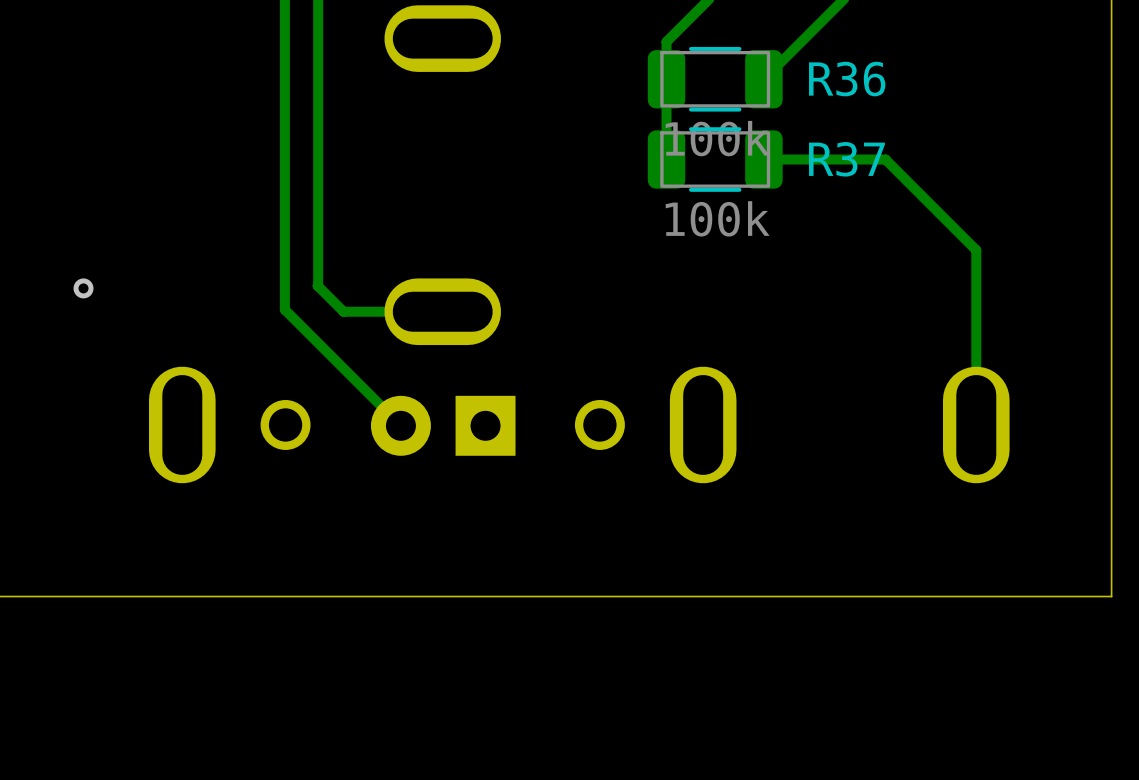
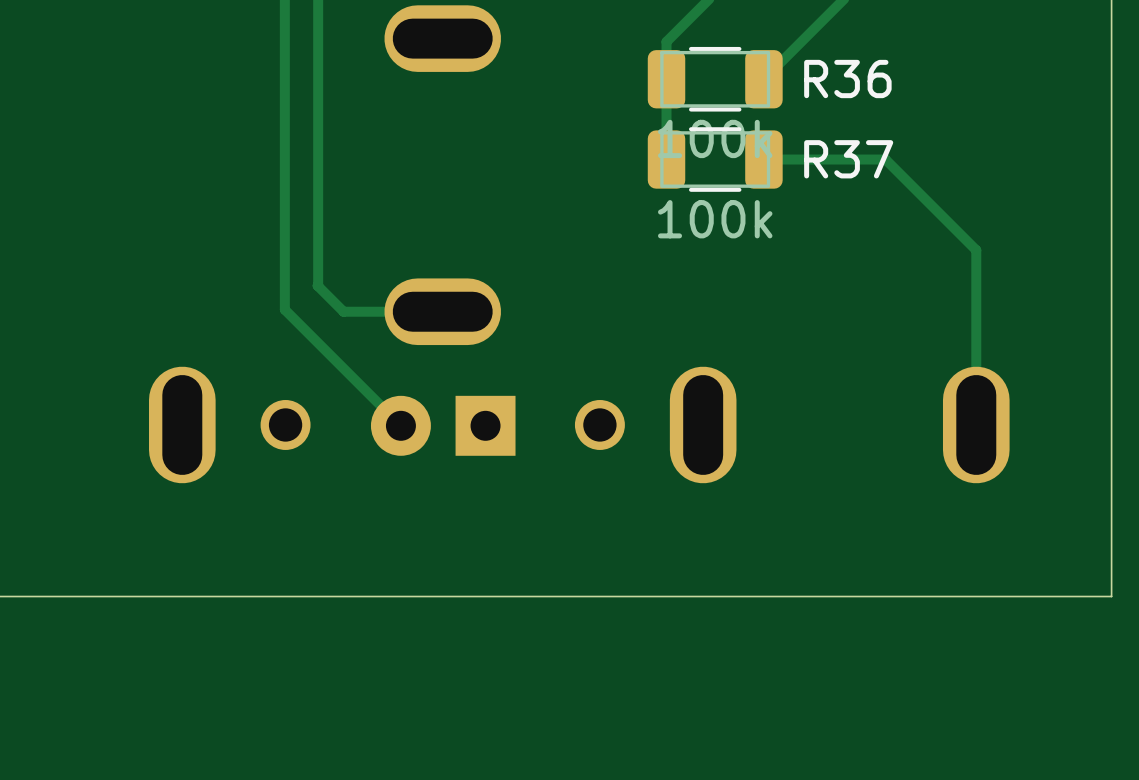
via: (83, 288) -> none

